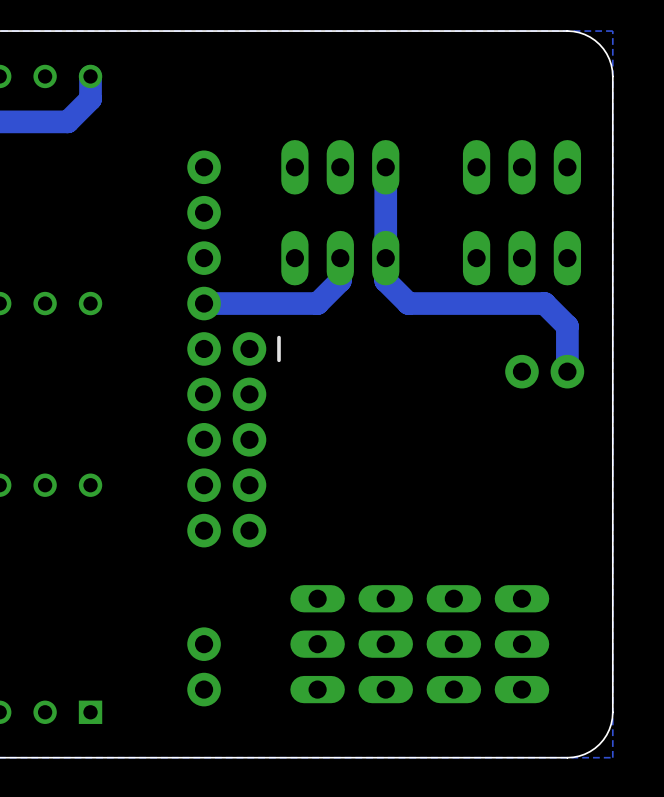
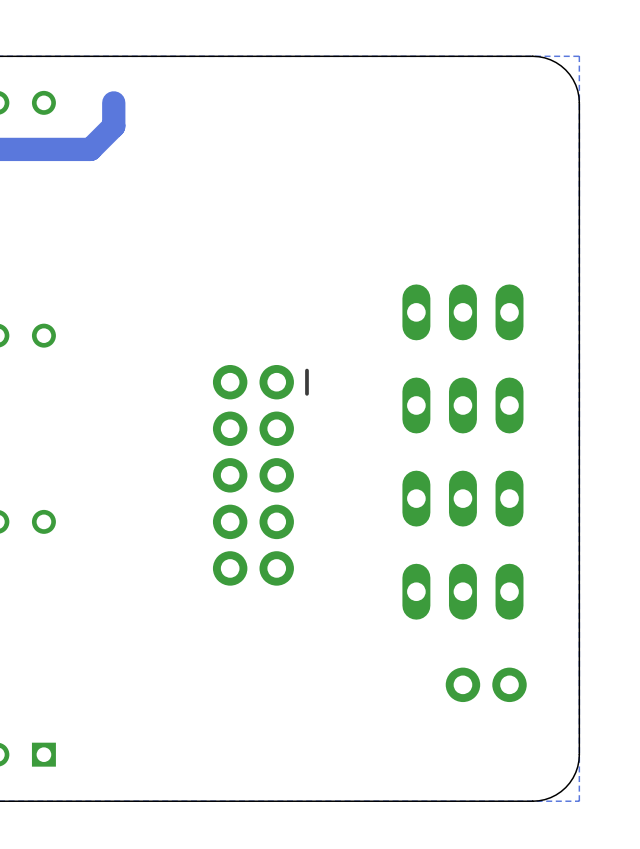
track: (90, 76) (90, 99) (67, 121) -> (113, 102) (113, 126) (90, 149) (20, 149)
part: (340, 167) -> none
track: (385, 167) (385, 280) (408, 303) (544, 303) (567, 326) (567, 371) -> none
part: (521, 167) -> none
part: (204, 235) -> none
track: (340, 258) (340, 280) (317, 303) (204, 303) -> none
part: (340, 258) -> none
part position: (521, 258) -> (462, 312)
part: none -> (462, 405)
part: (544, 371) -> none
part position: (234, 439) -> (260, 475)
part: none -> (462, 498)
part: none -> (462, 591)
part footprint: [494, 585, 550, 704] -> [445, 667, 527, 703]
part: (317, 644) -> none
part: (385, 644) -> none
part: (453, 644) -> none
part: (204, 666) -> none

